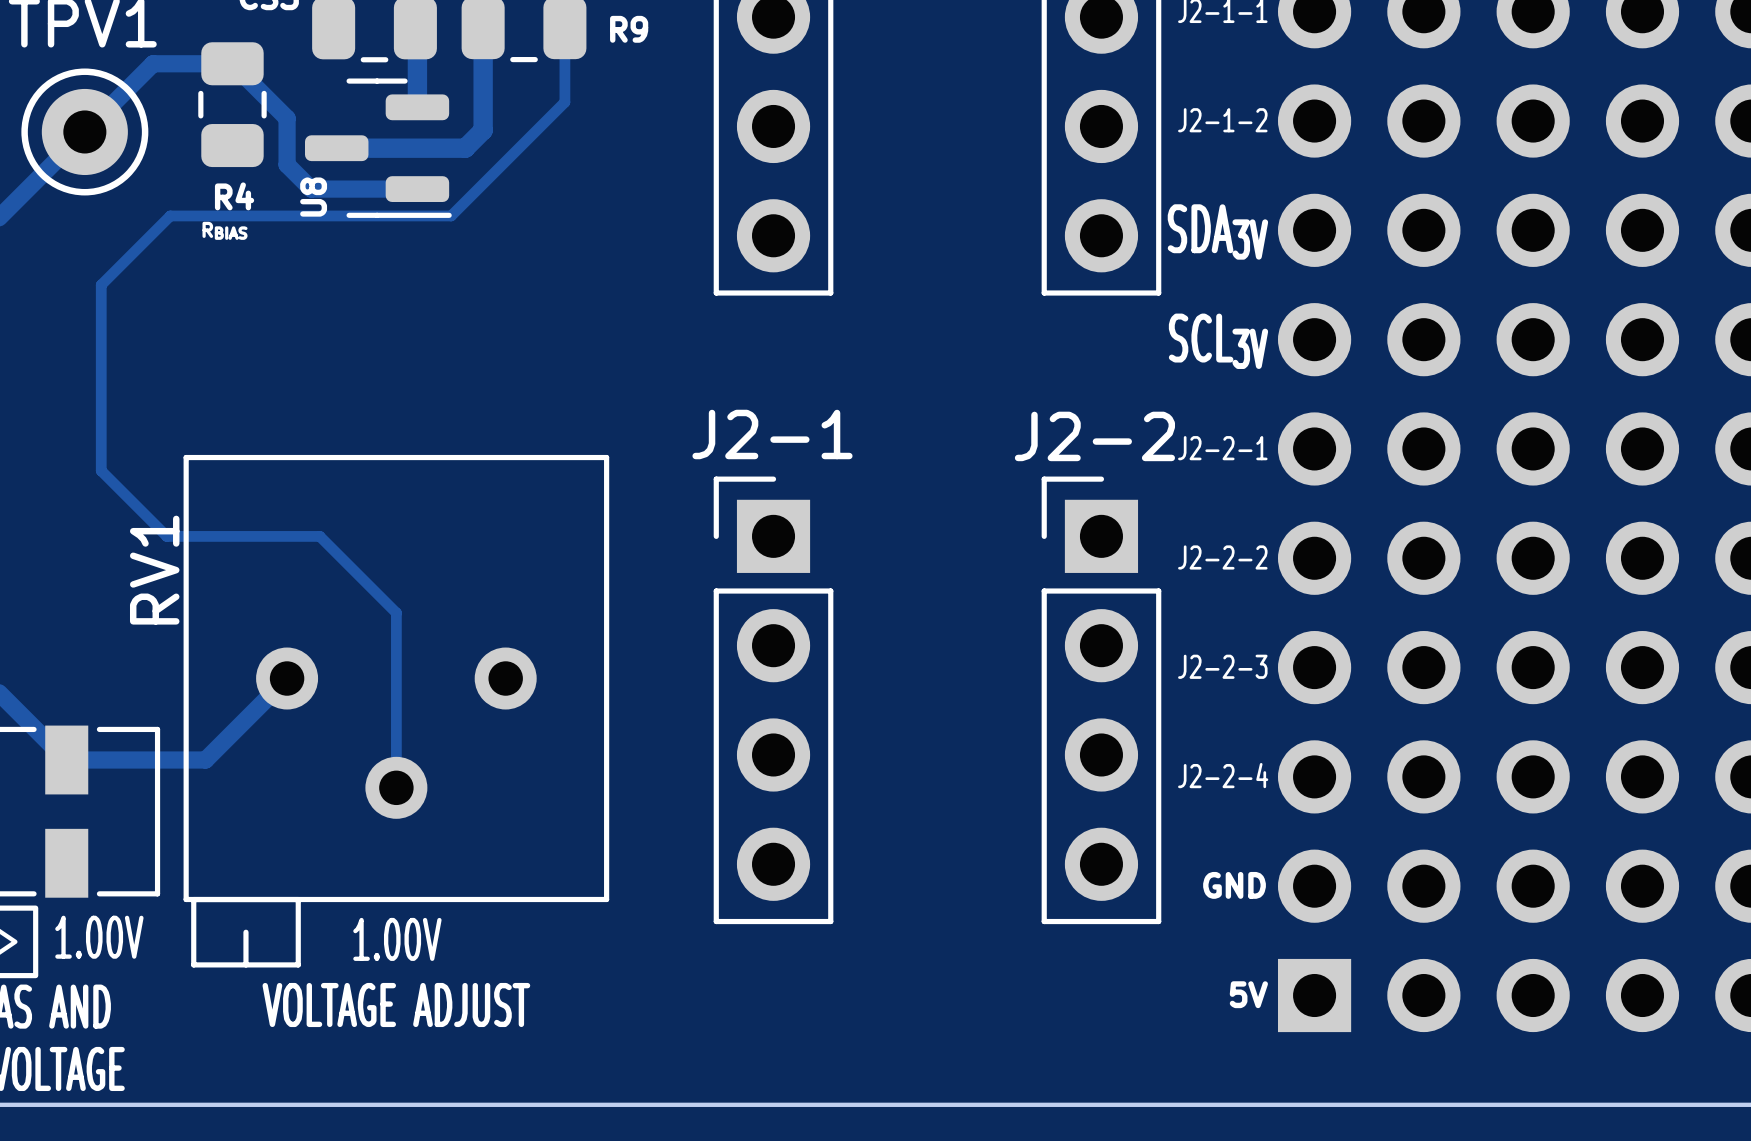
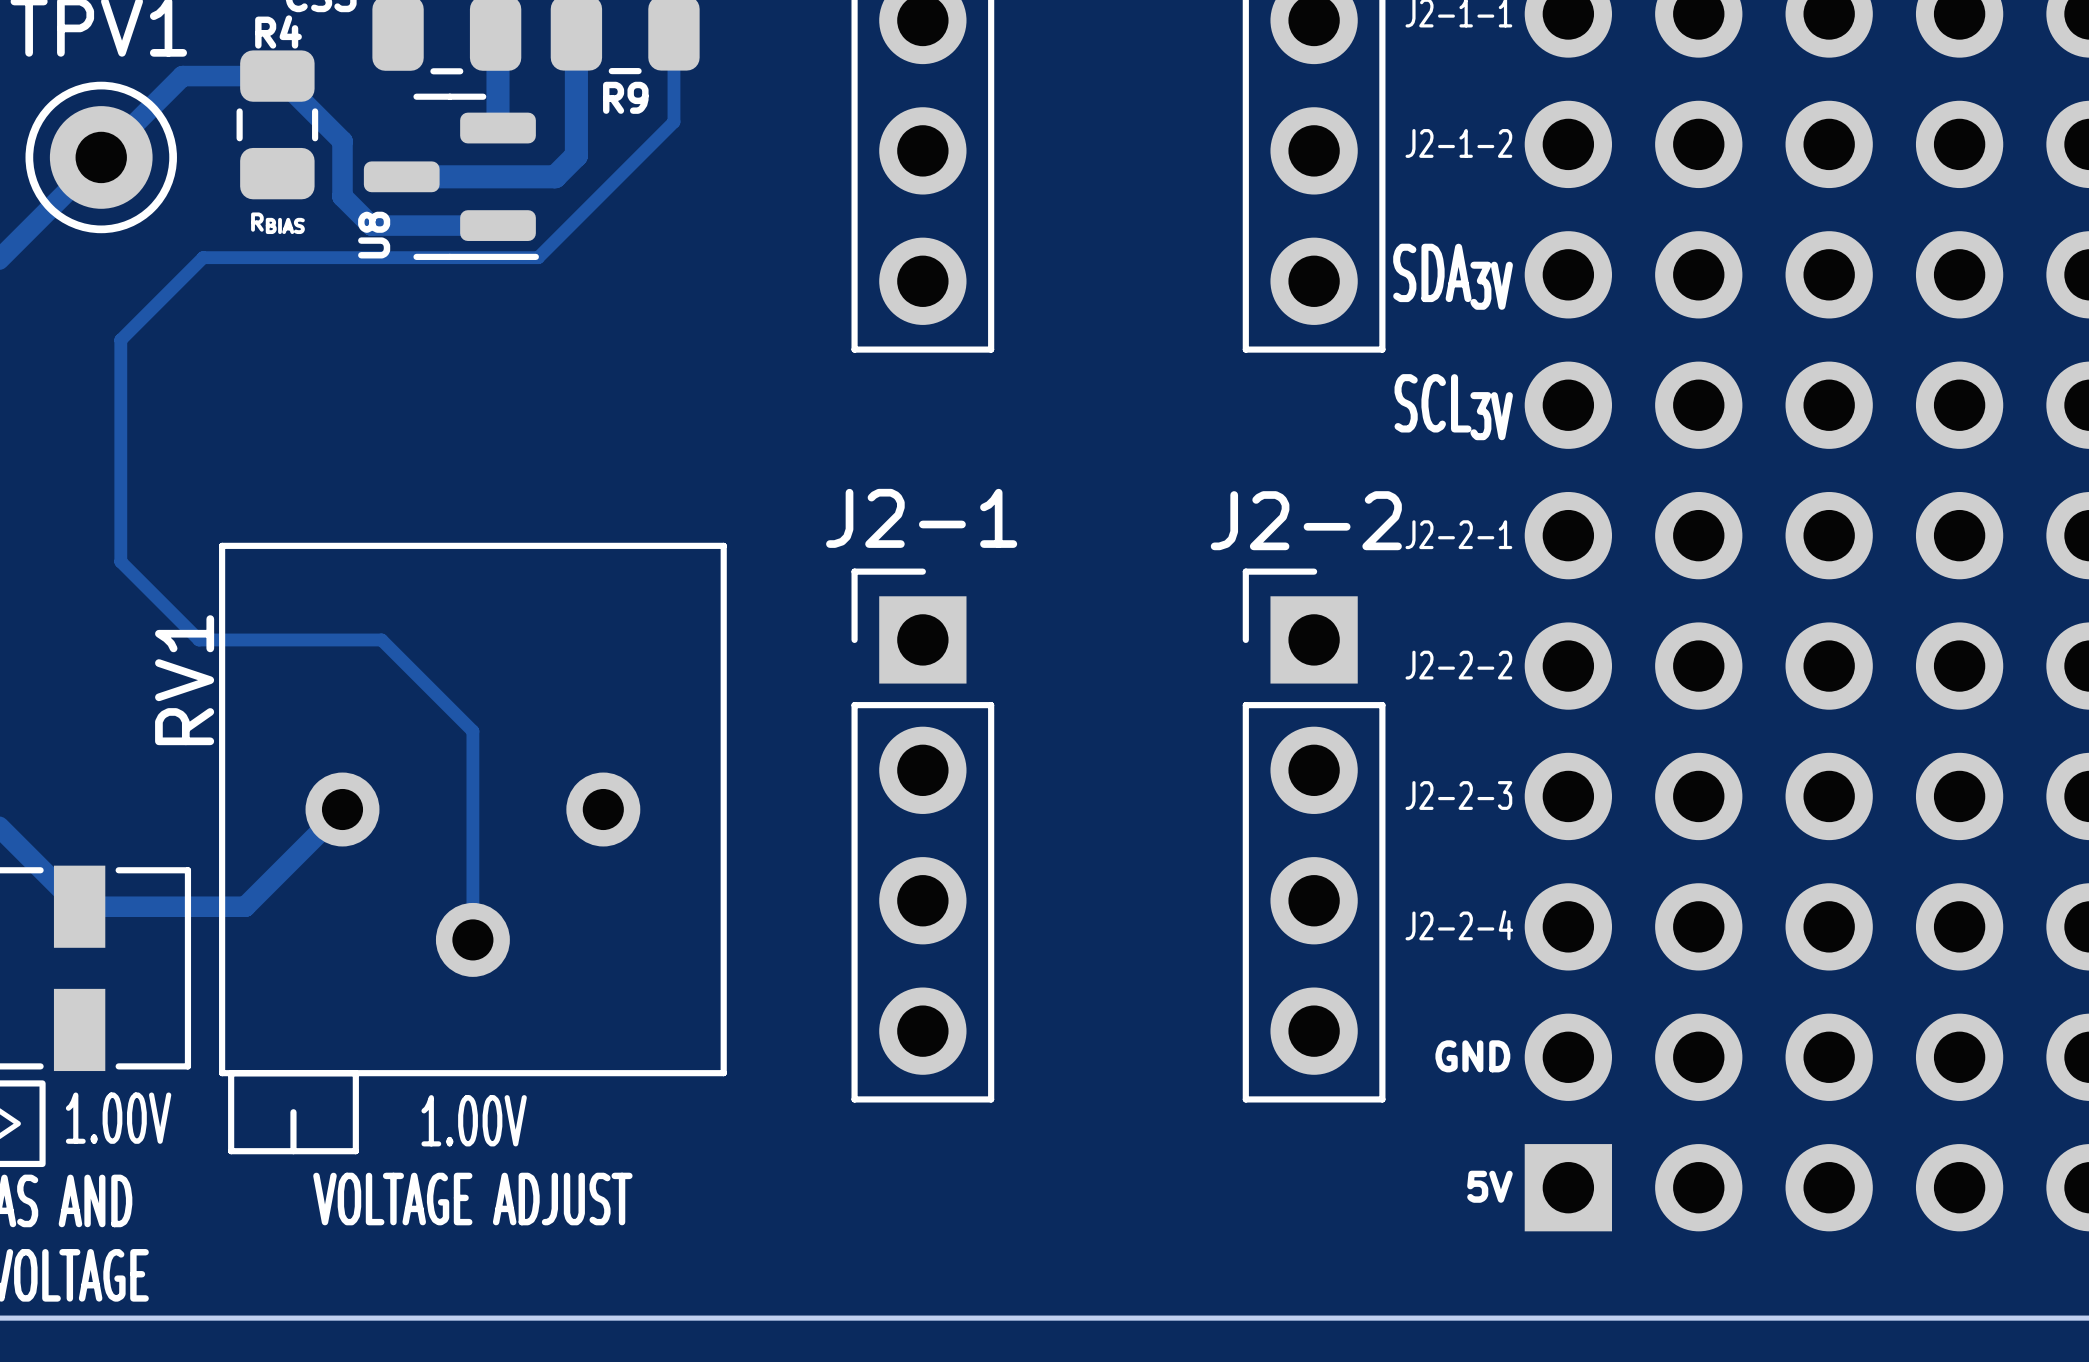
R9 name position: R9 (629, 29) -> R9 (625, 97)
R4 name position: R4 (234, 196) -> R4 (278, 31)
text position: RBIAS (225, 230) -> RBIAS (277, 223)

